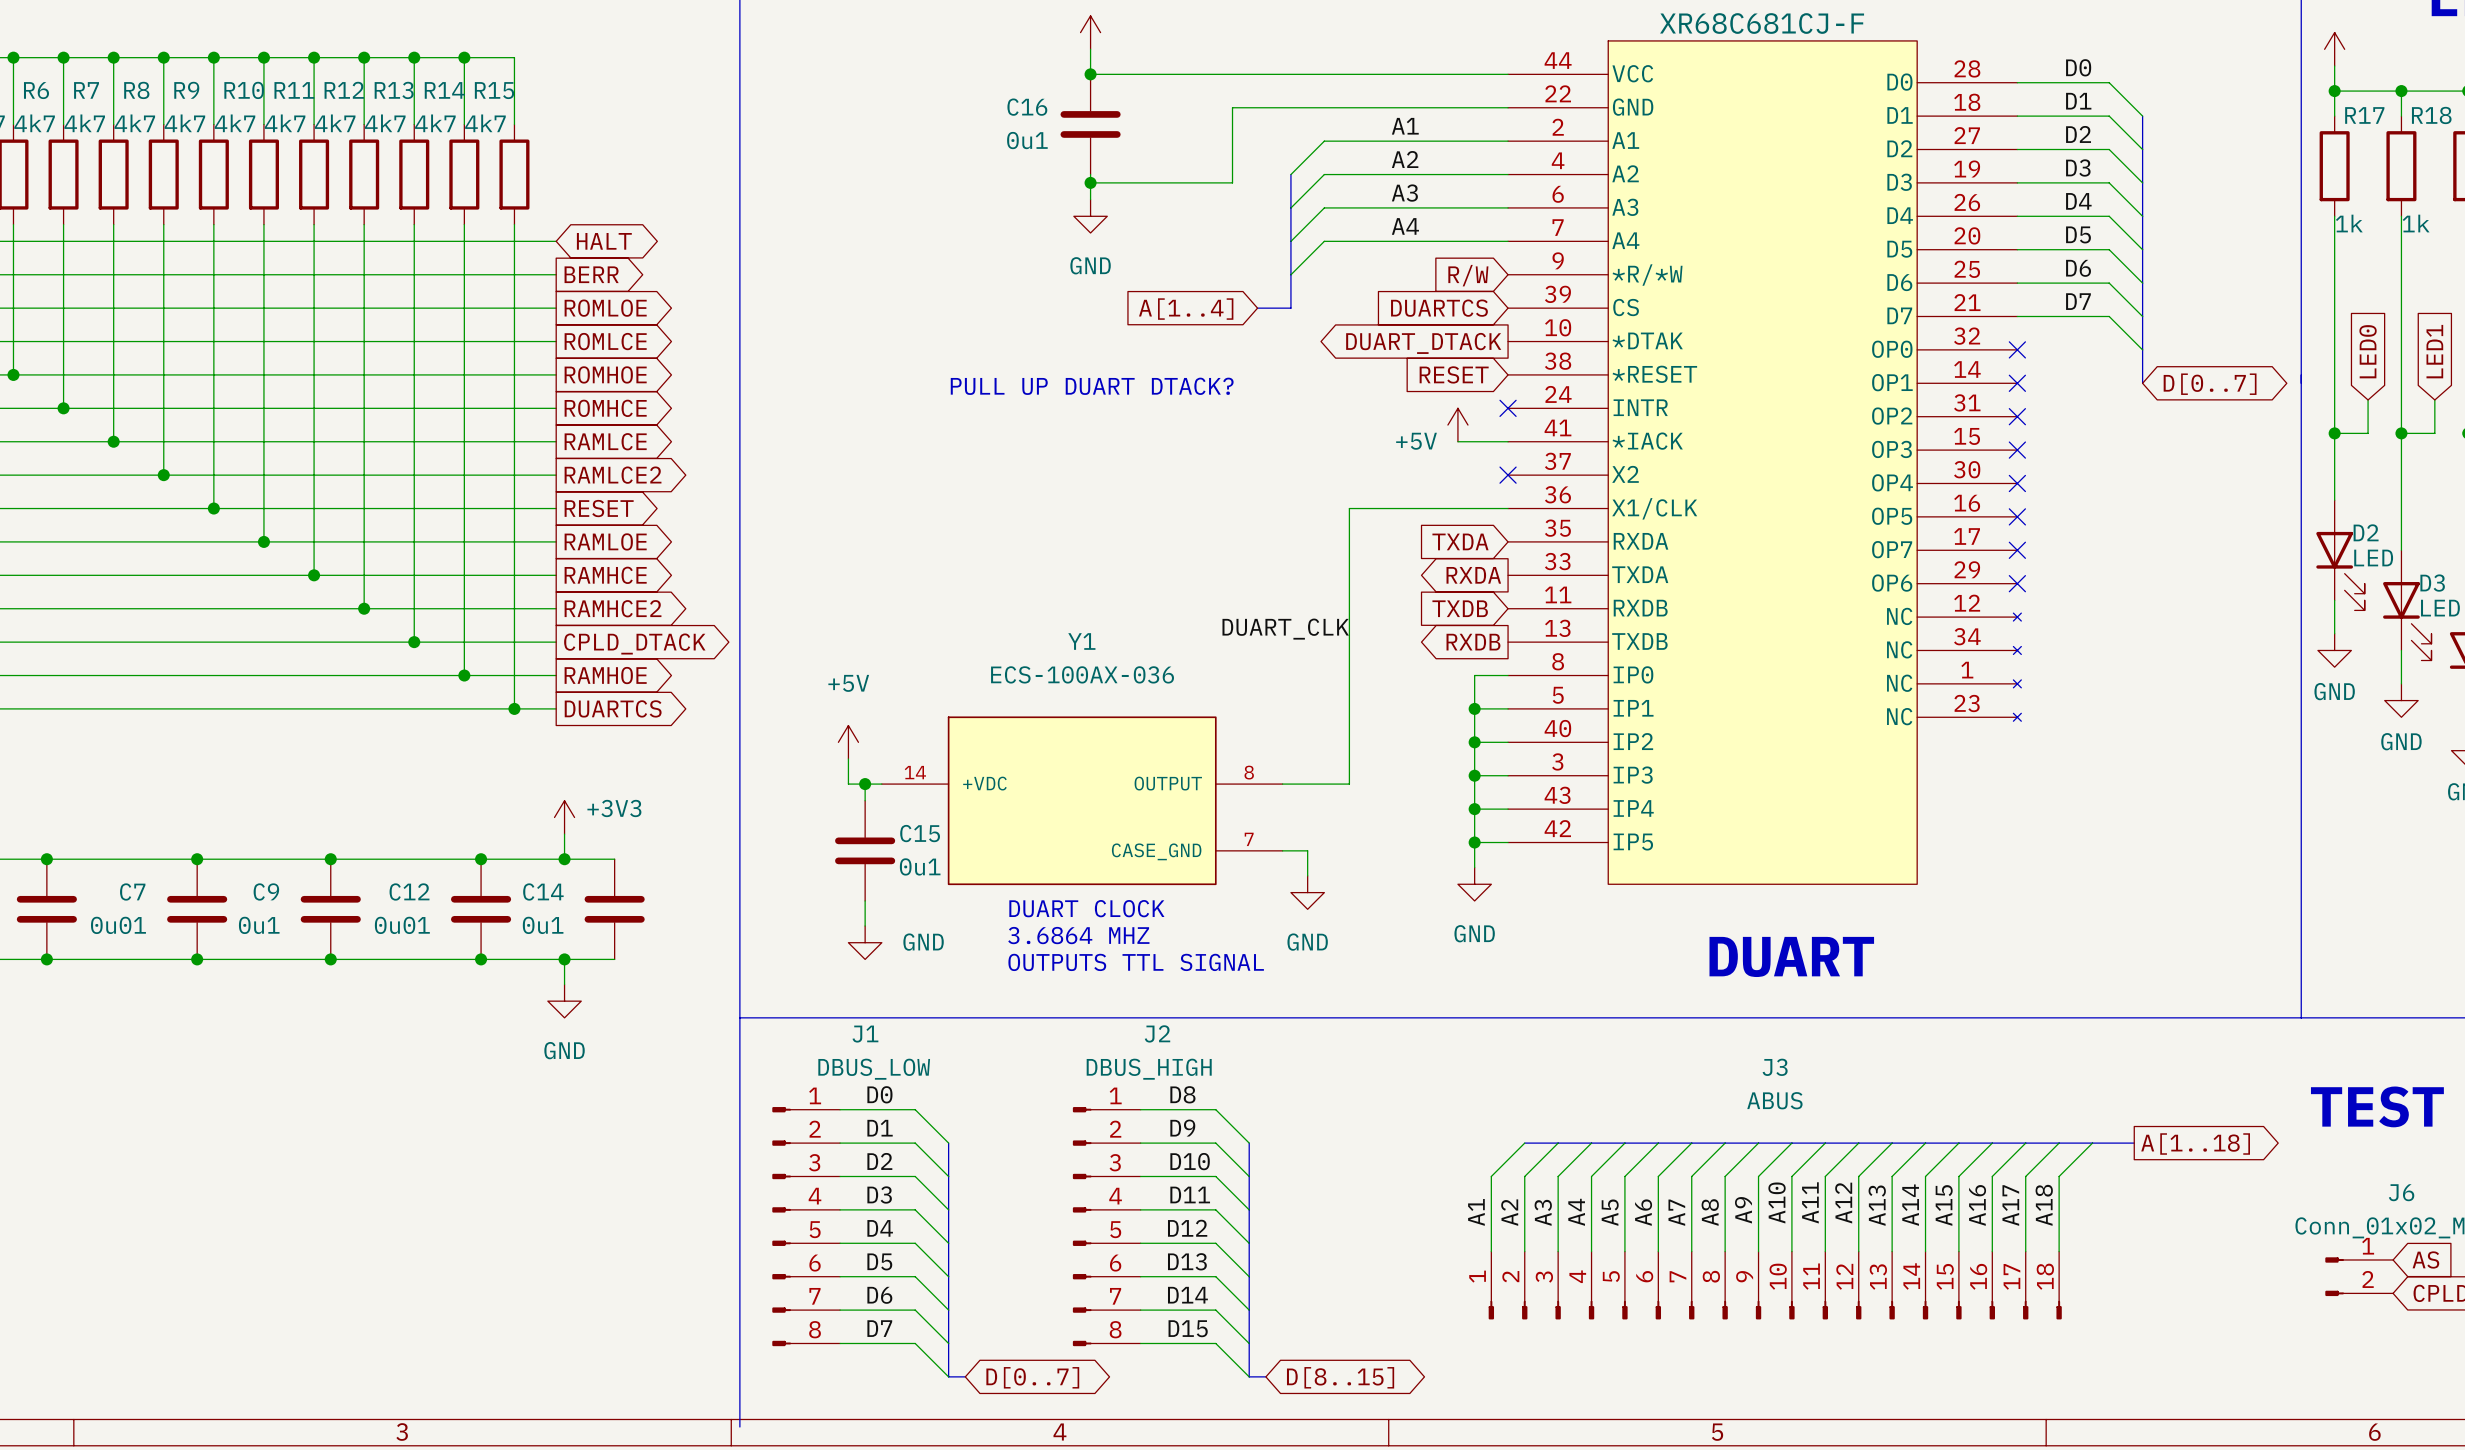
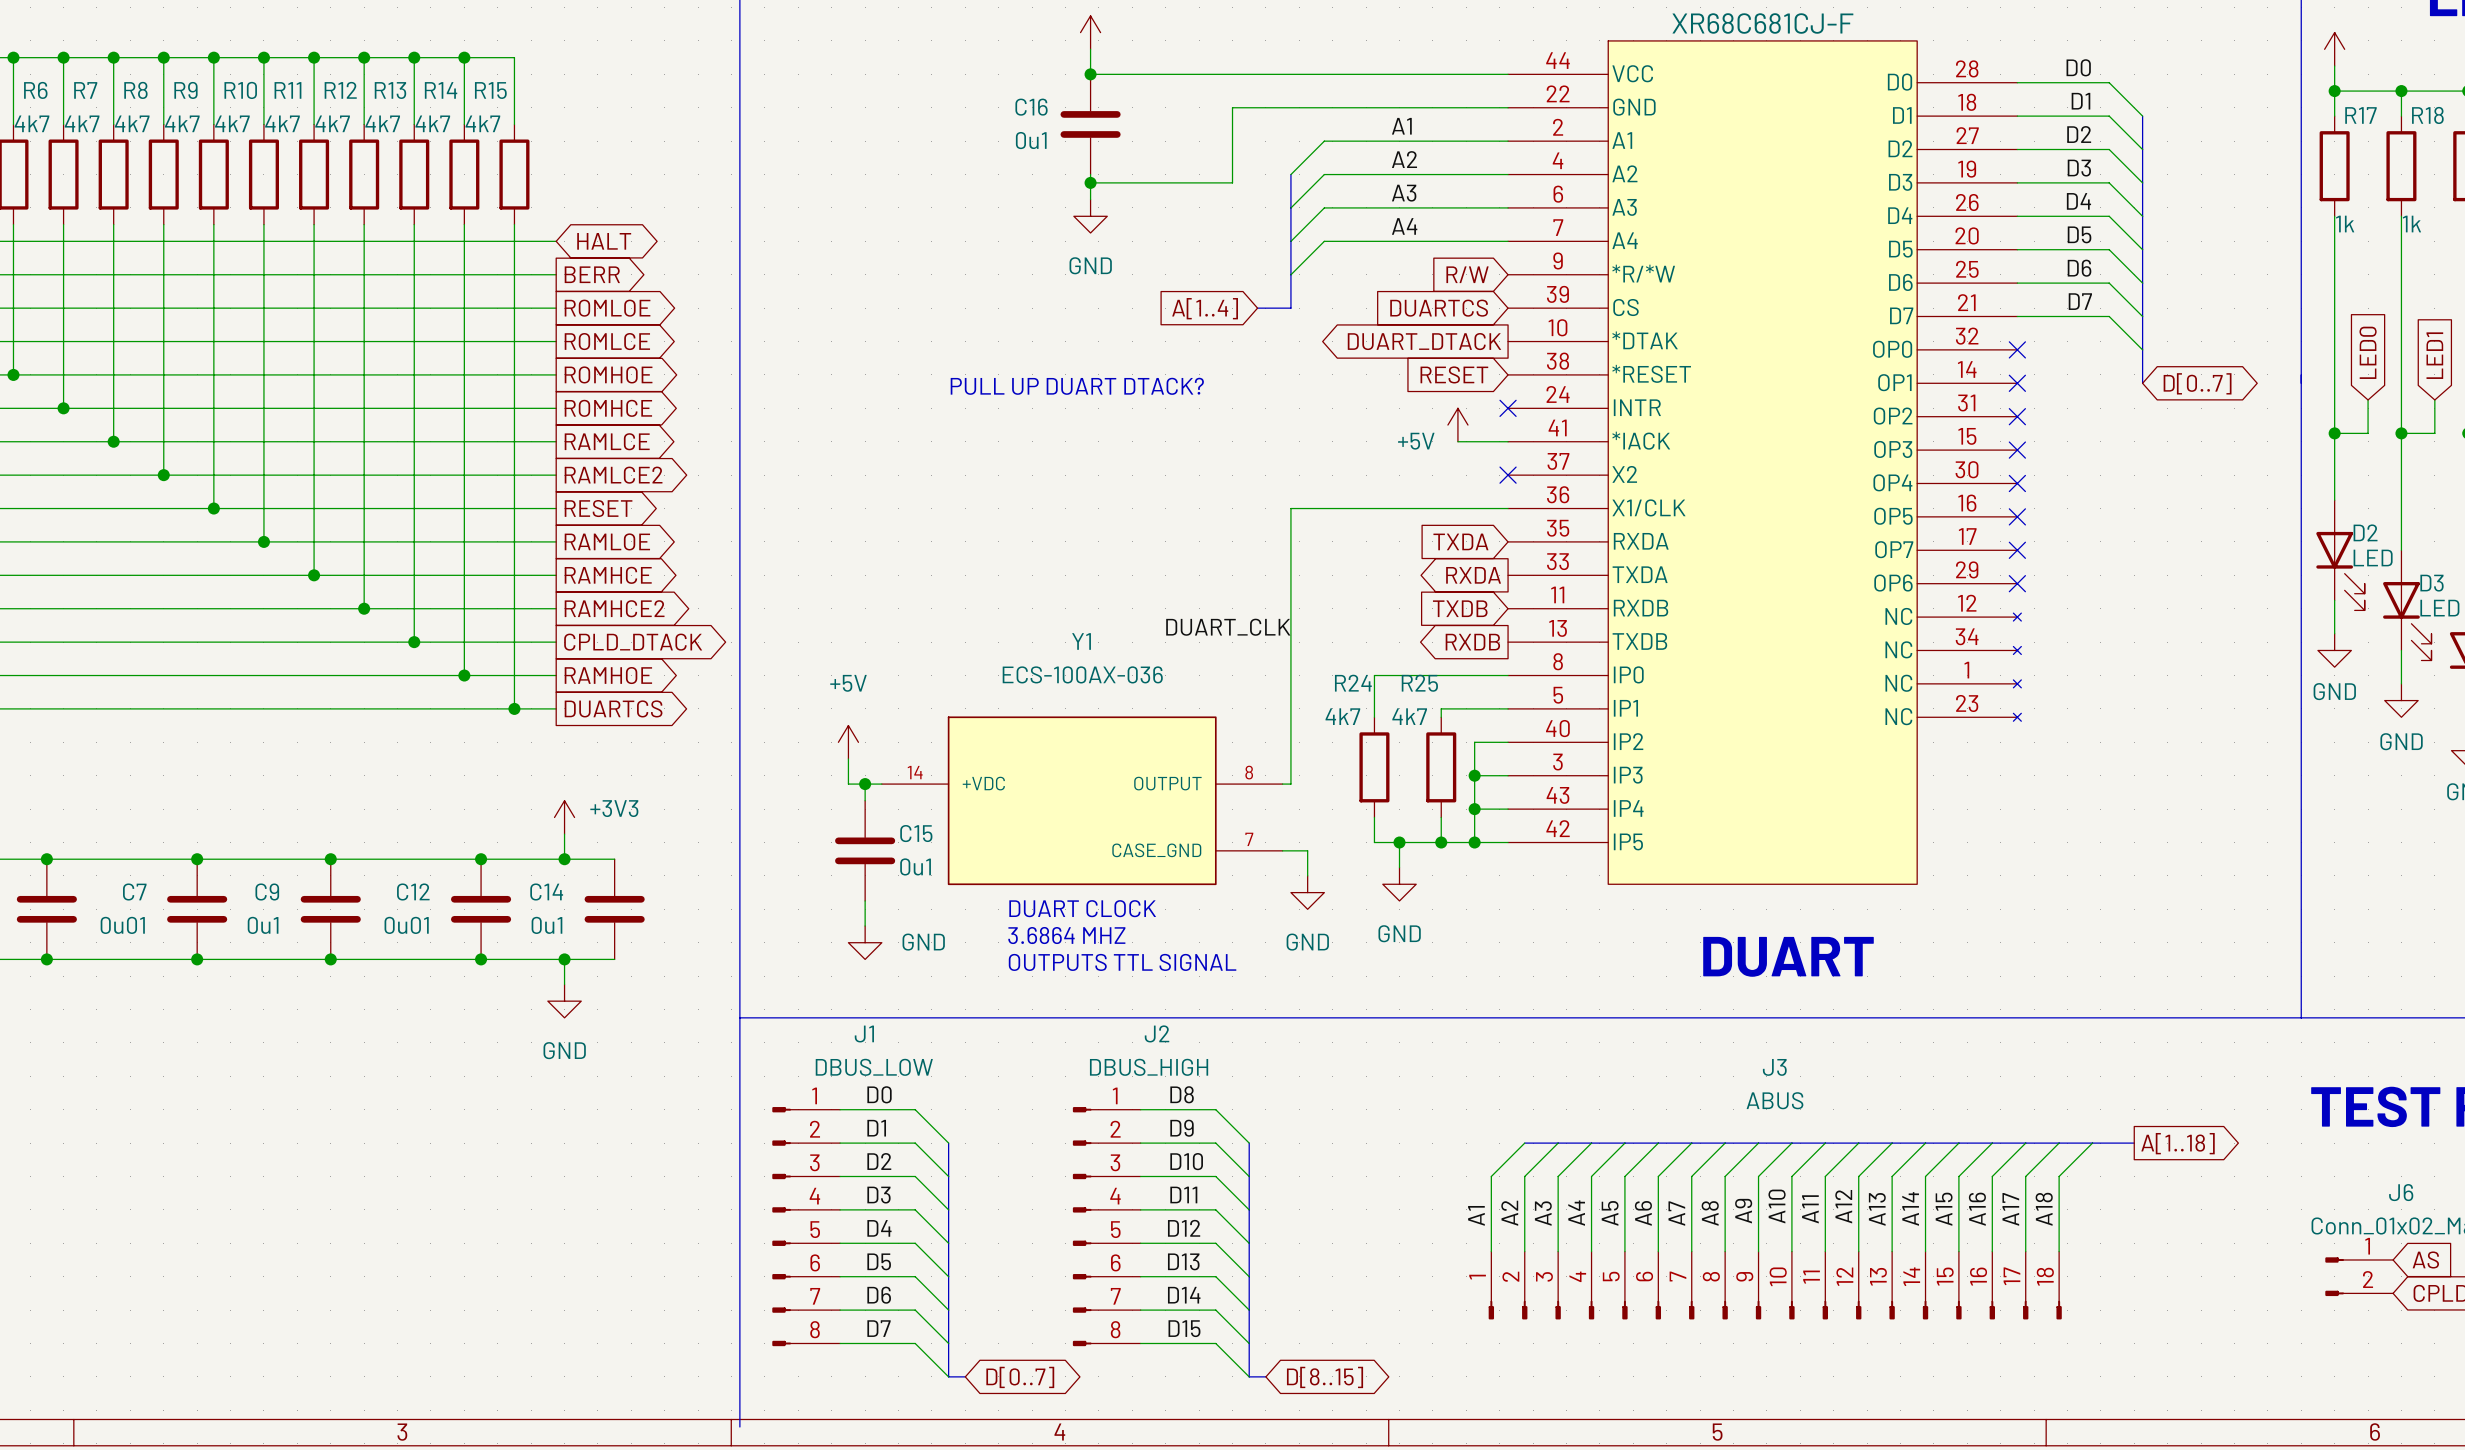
wire: (1349, 508) (1349, 784) (1290, 784) -> (1349, 508) (1290, 508) (1290, 784)
label position: DUART_CLK (1285, 629) -> DUART_CLK (1228, 627)
wire: (1474, 675) (1474, 742) -> (1474, 675) (1374, 675) (1374, 717)
wire: none -> (1474, 708) (1441, 708) (1441, 717)
junction: (1474, 708) -> none
junction: (1474, 742) -> none
R24: none -> 4k7 (1374, 767)
R25: none -> 4k7 (1441, 767)
wire: none -> (1441, 817) (1441, 842)
wire: none -> (1399, 842) (1399, 867)
junction: none -> (1399, 842)
junction: none -> (1441, 842)
wire: (1474, 842) (1474, 867) -> (1474, 842) (1374, 842) (1374, 817)
power symbol position: GND (1474, 884) -> GND (1399, 884)

